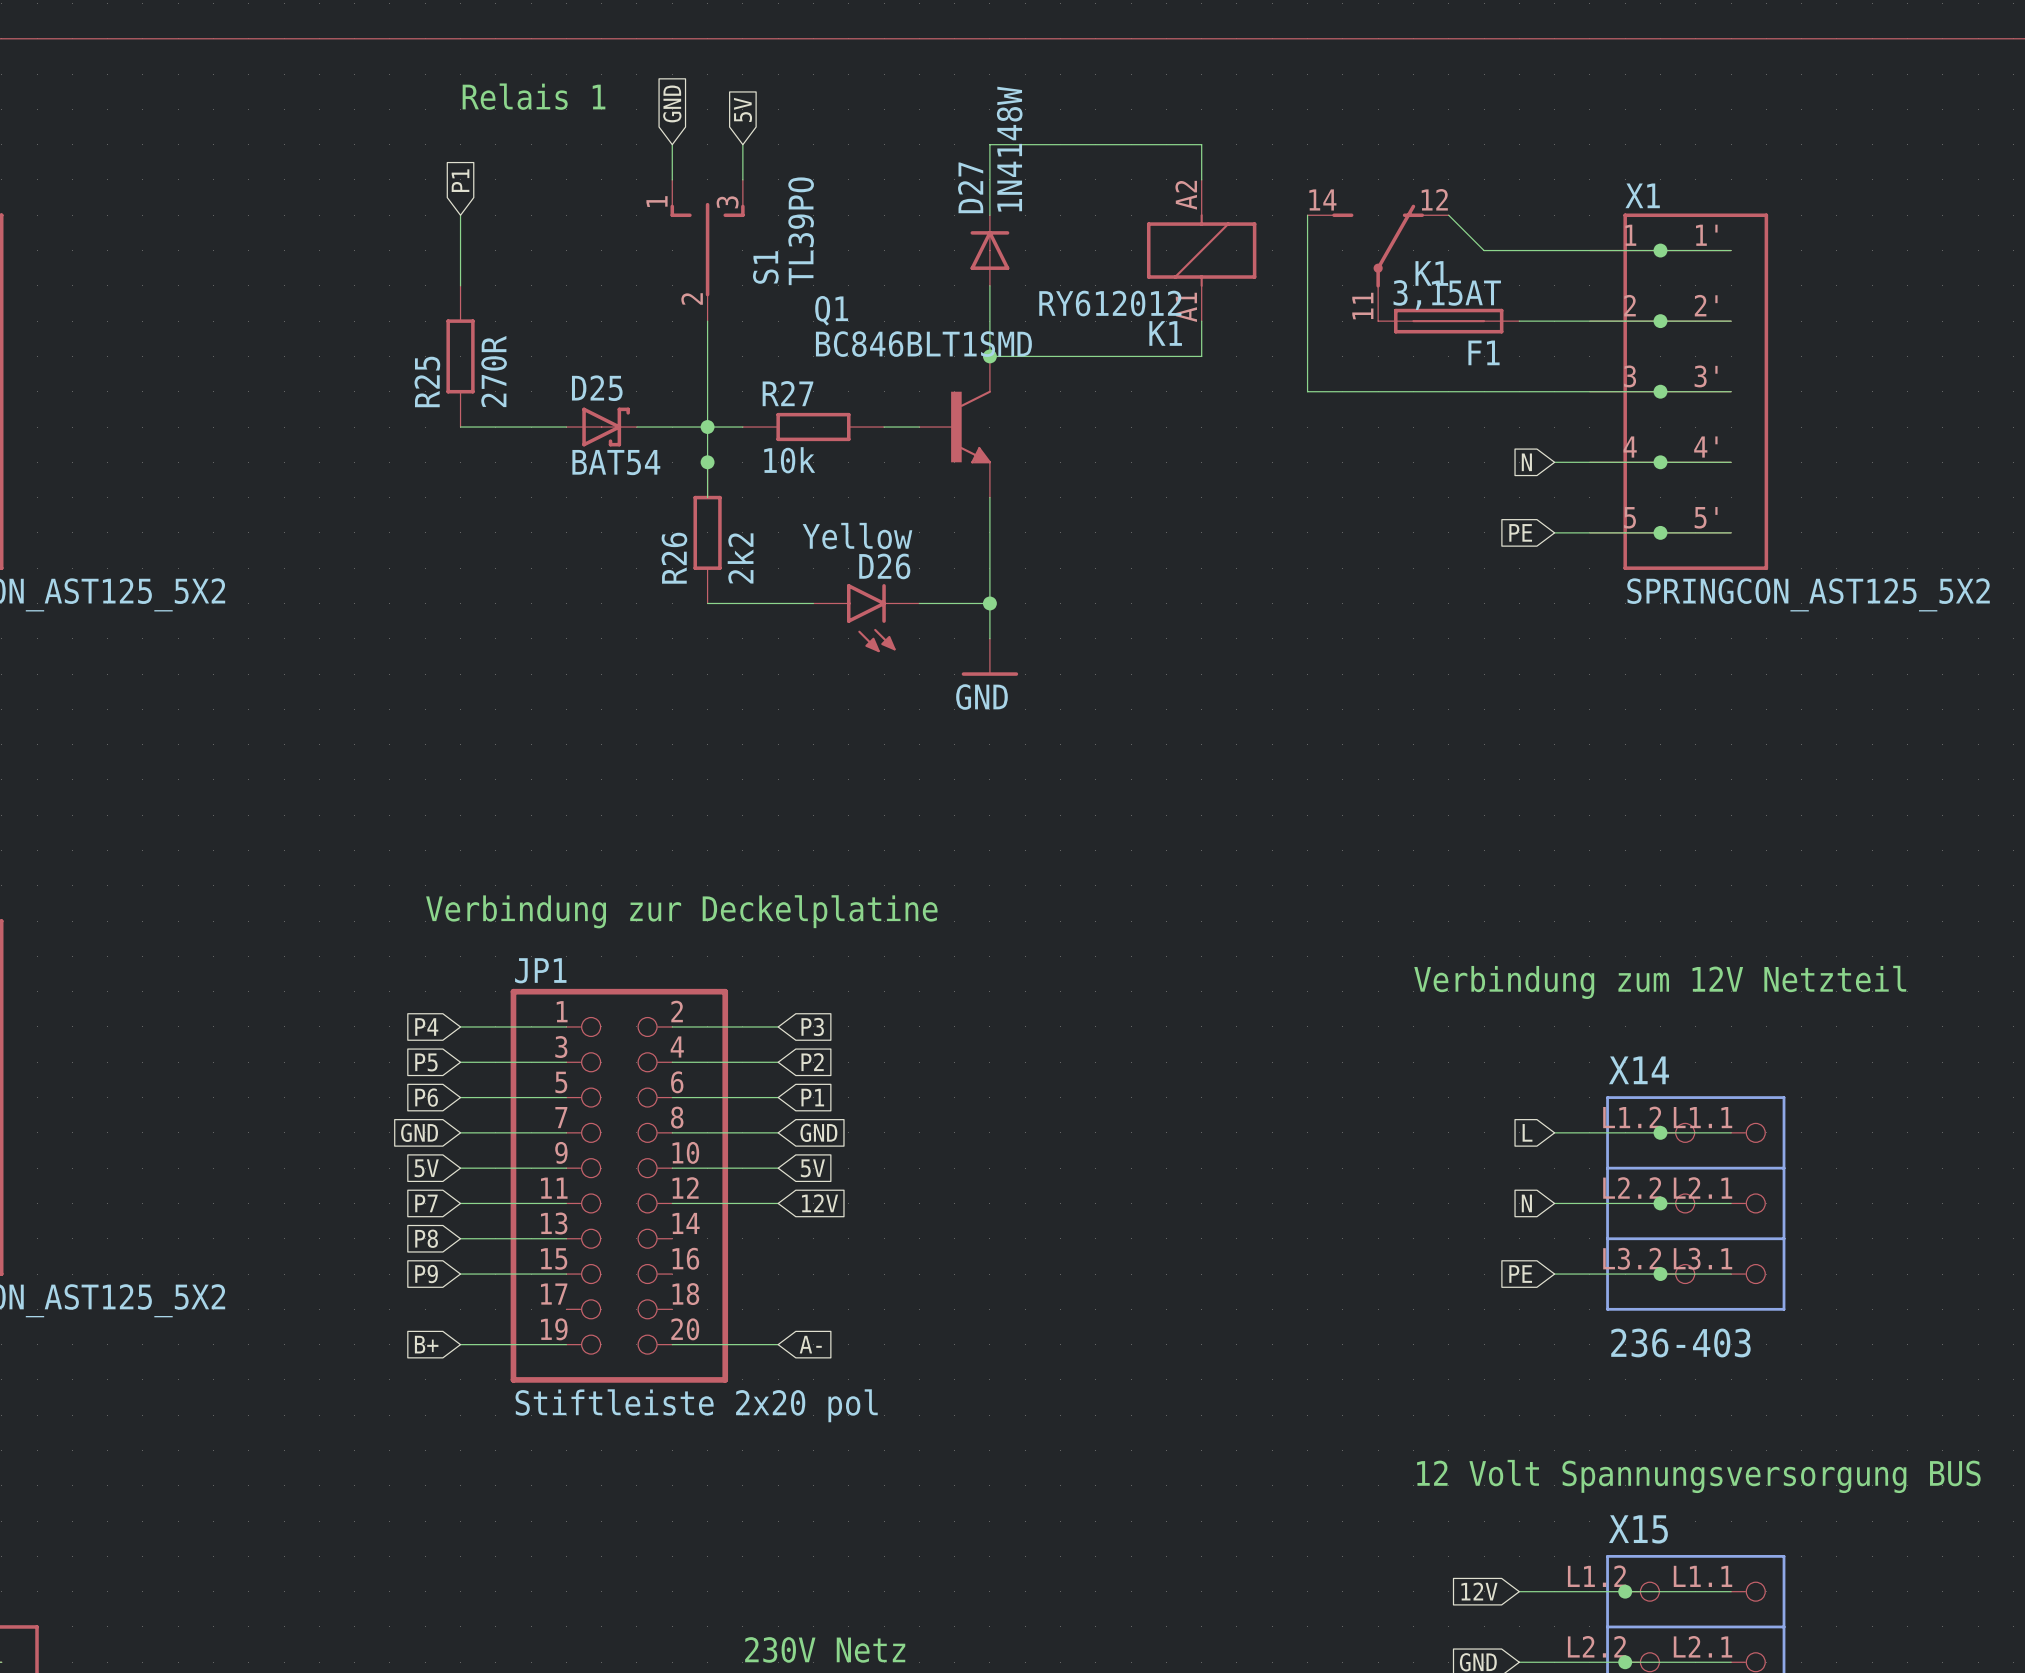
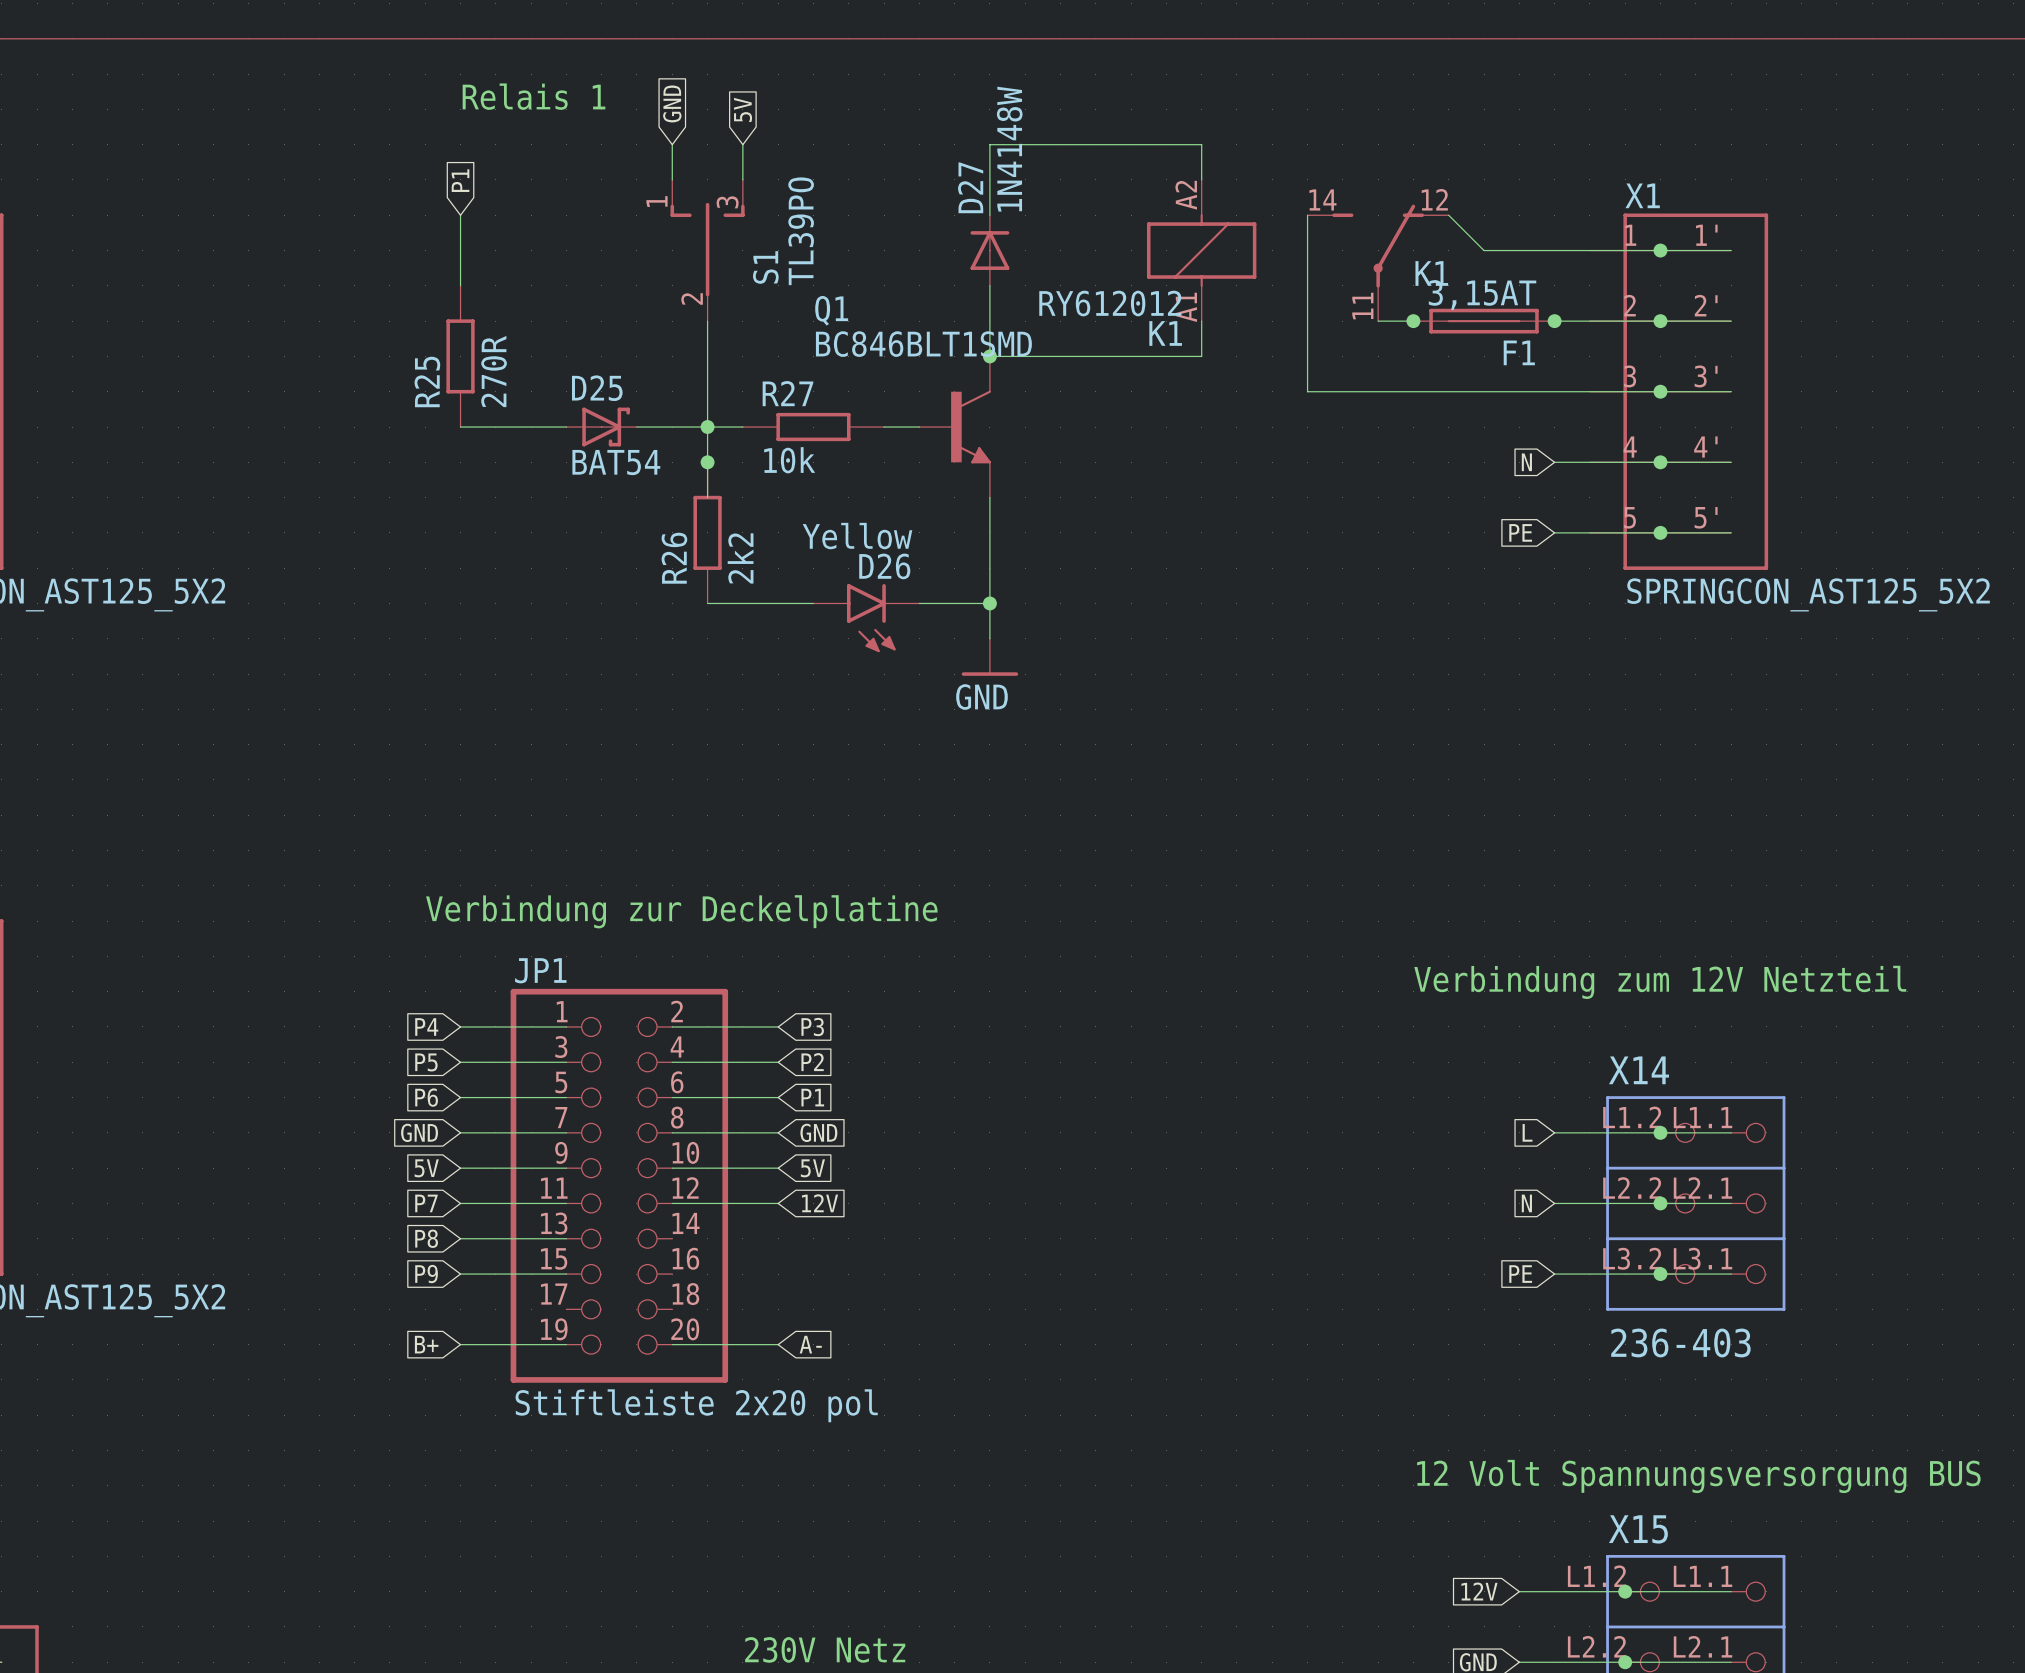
junction: none -> (1413, 321)
F1 position: (1448, 321) -> (1484, 321)
junction: none -> (1554, 321)

